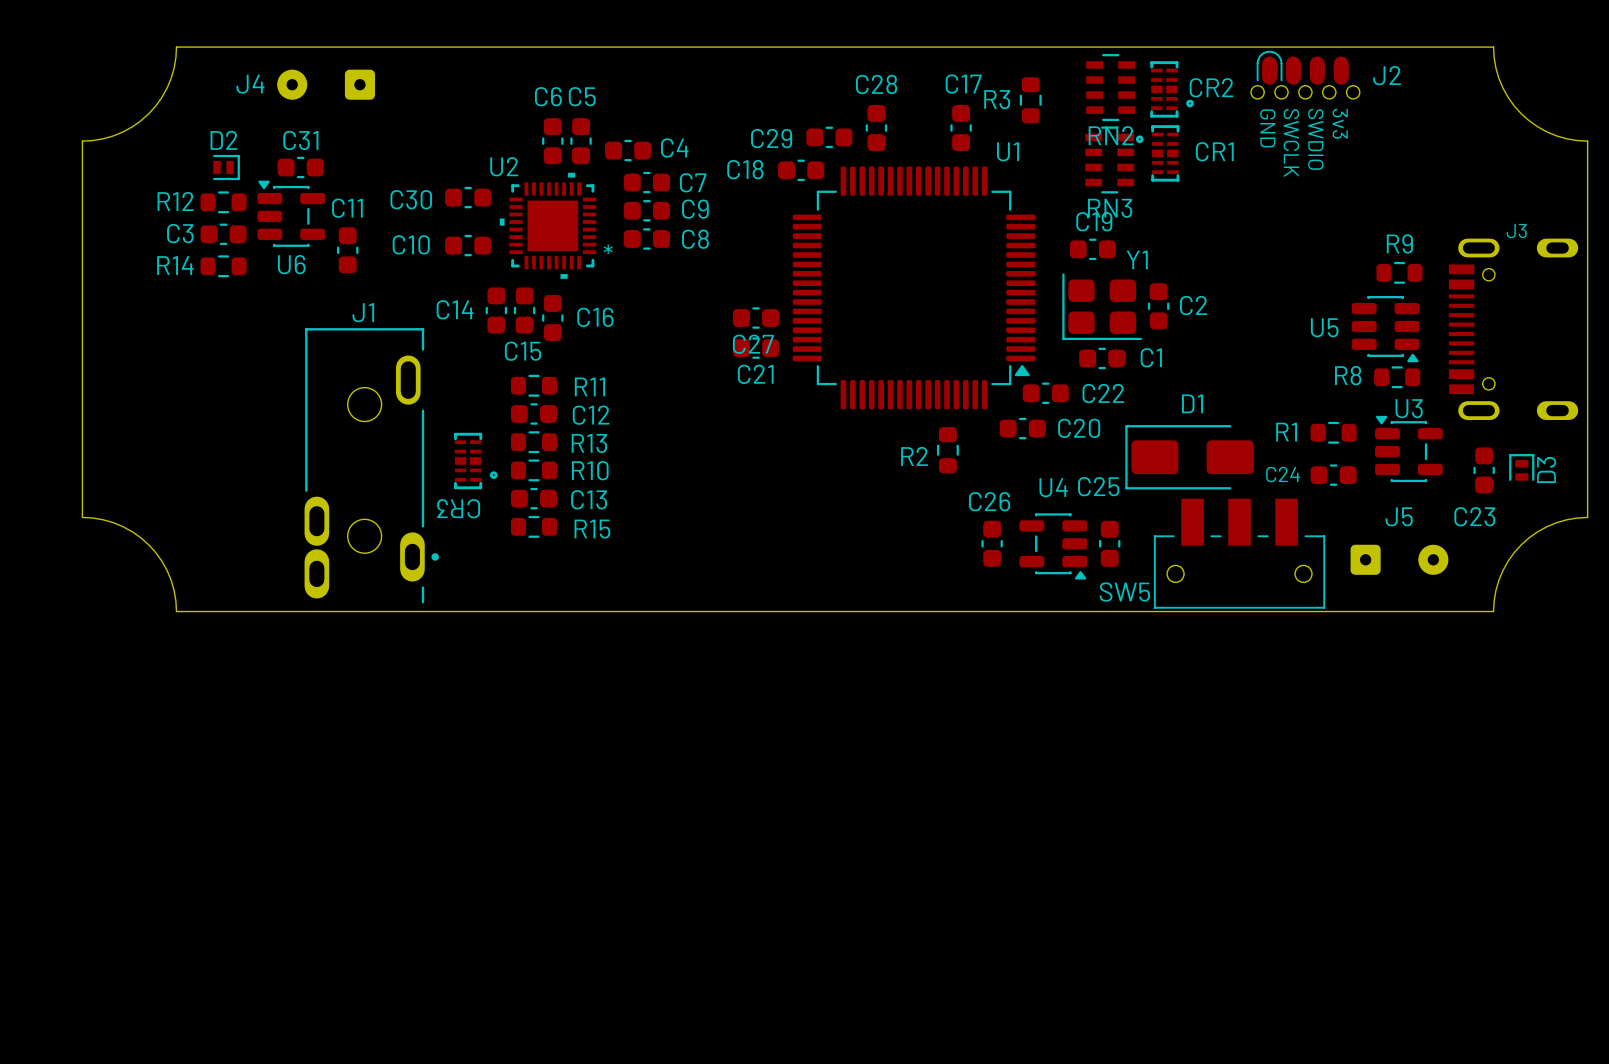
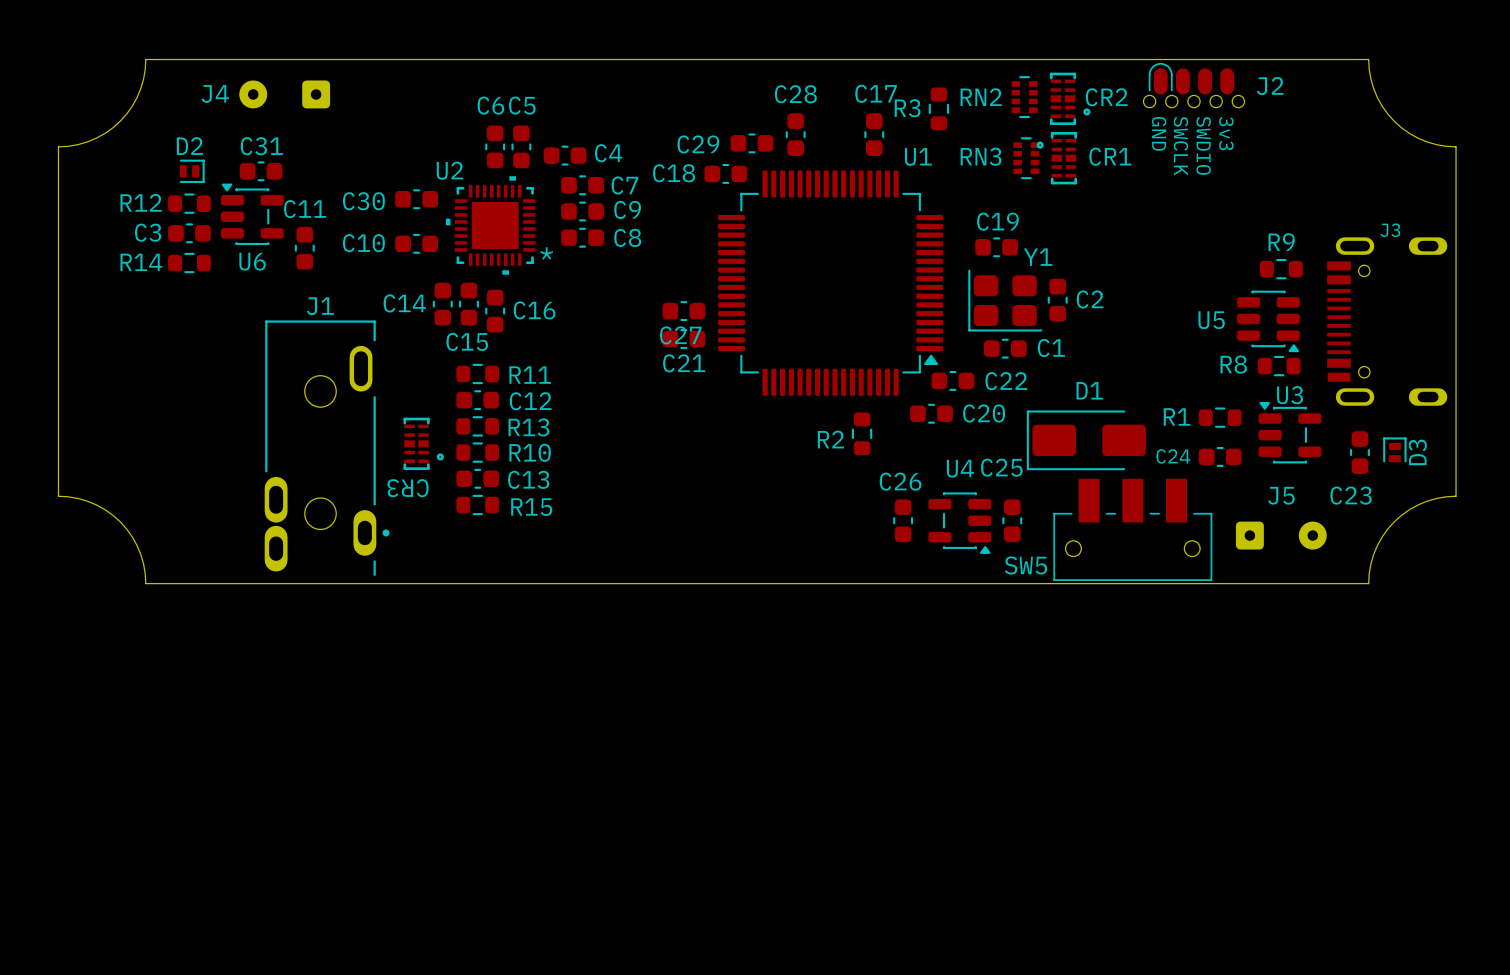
RN2 footprint: [1086, 54, 1136, 122] -> [1011, 76, 1038, 119]
RN3 footprint: [1085, 126, 1135, 194] -> [1013, 137, 1040, 180]
RN2 name position: RN2 (1111, 135) -> RN2 (981, 97)
RN3 name position: RN3 (1110, 208) -> RN3 (981, 156)

